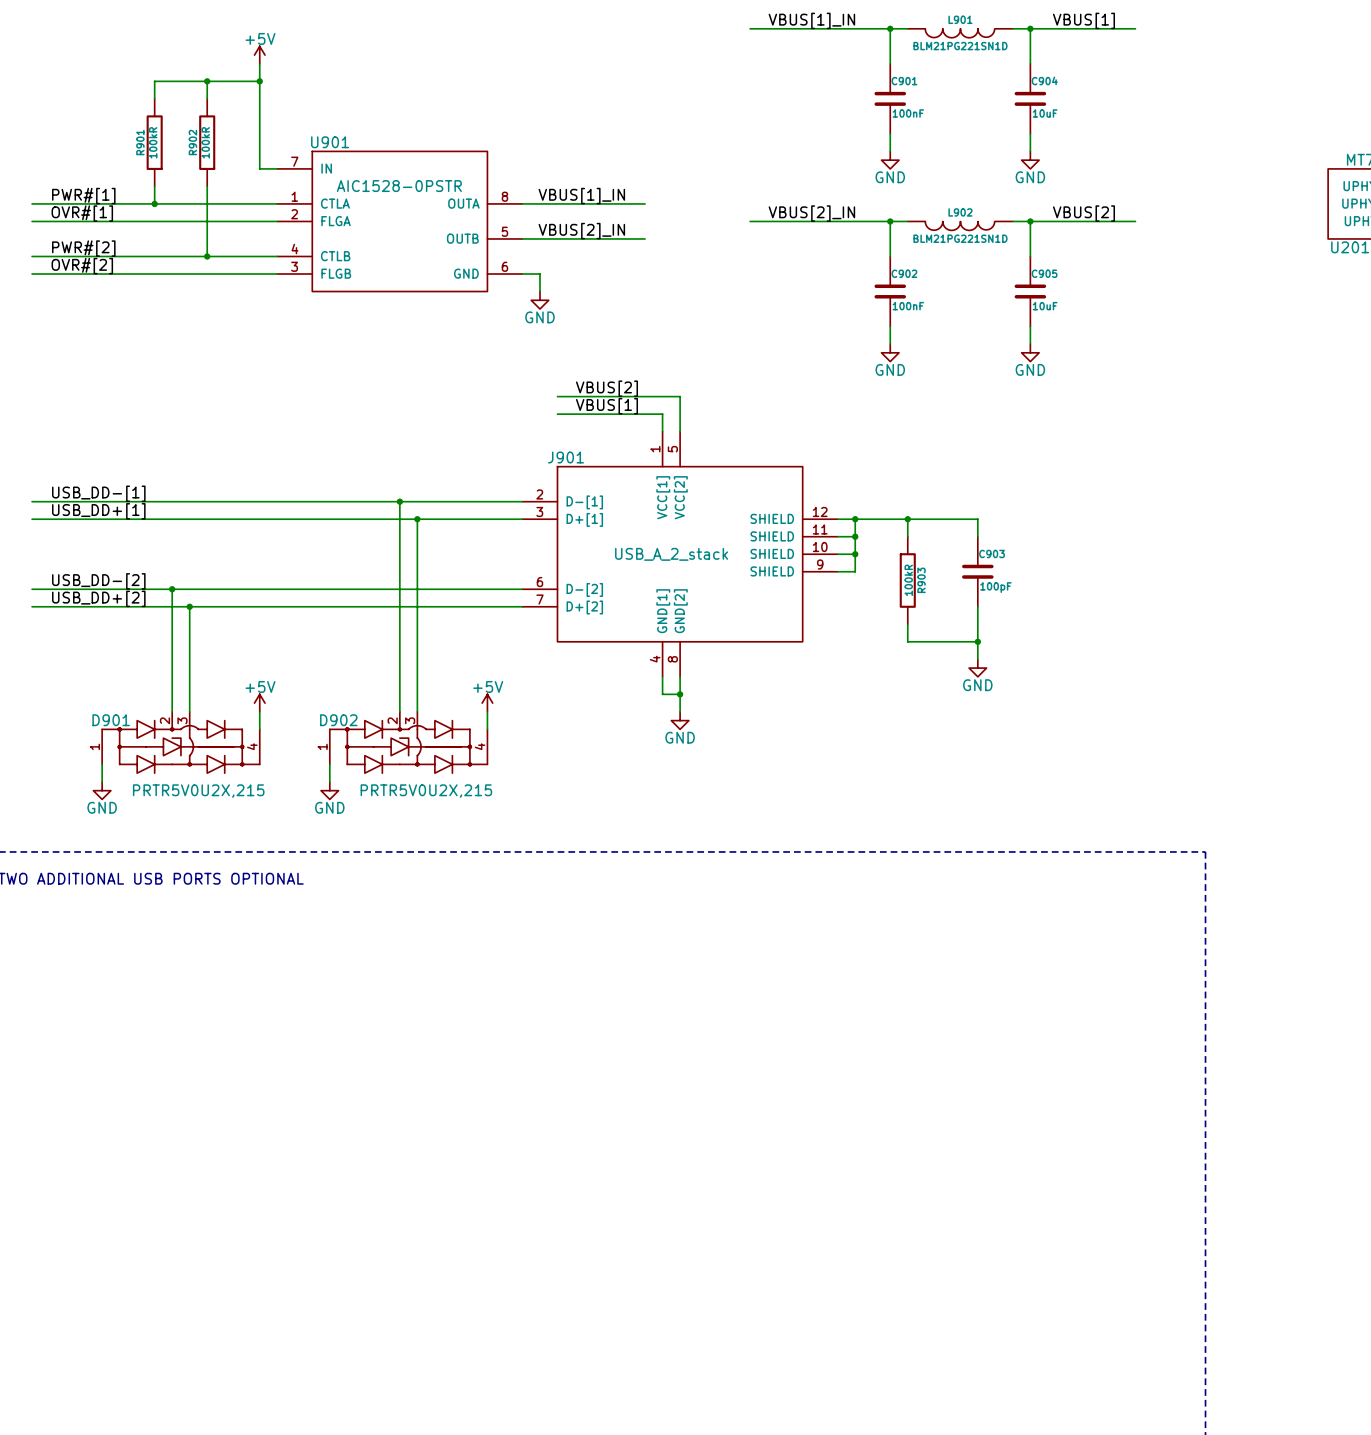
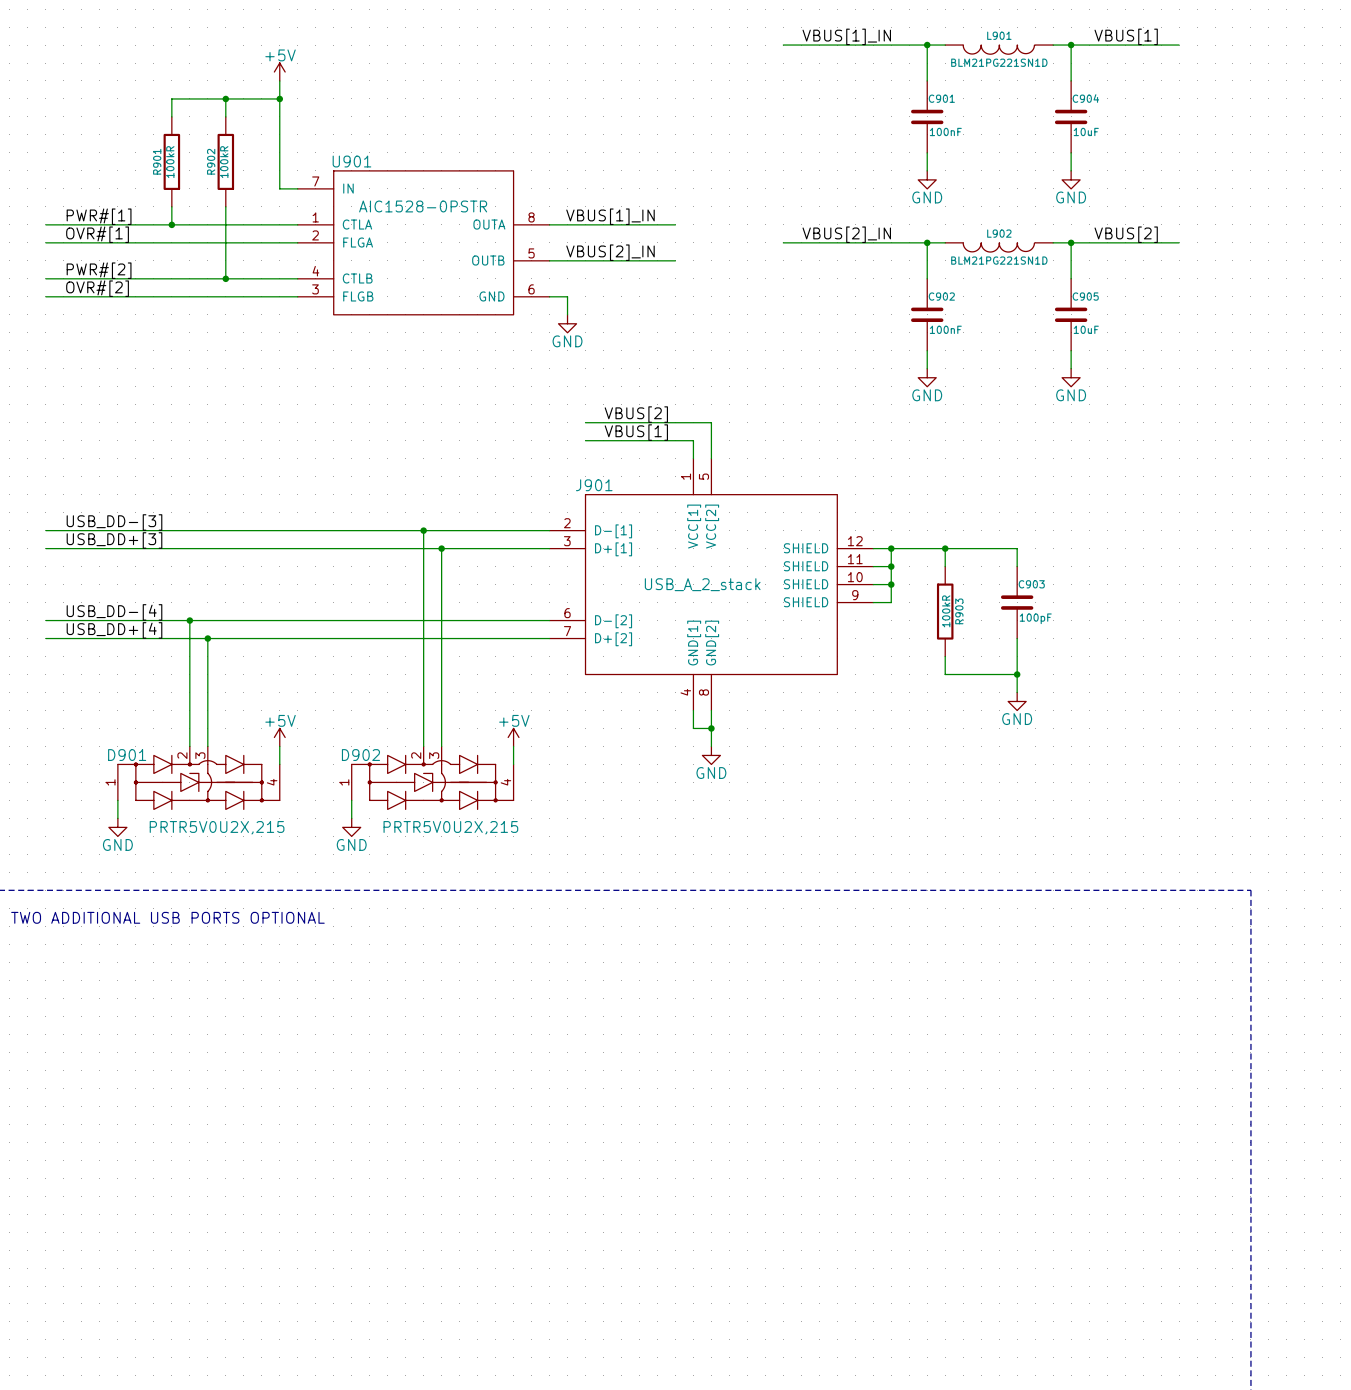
label: USB_DD-[1] (98, 493) -> USB_DD-[3] (114, 522)
label: USB_DD+[1] (98, 511) -> USB_DD+[3] (114, 540)
label: USB_DD-[2] (98, 581) -> USB_DD-[4] (114, 612)
label: USB_DD+[2] (98, 598) -> USB_DD+[4] (114, 630)

